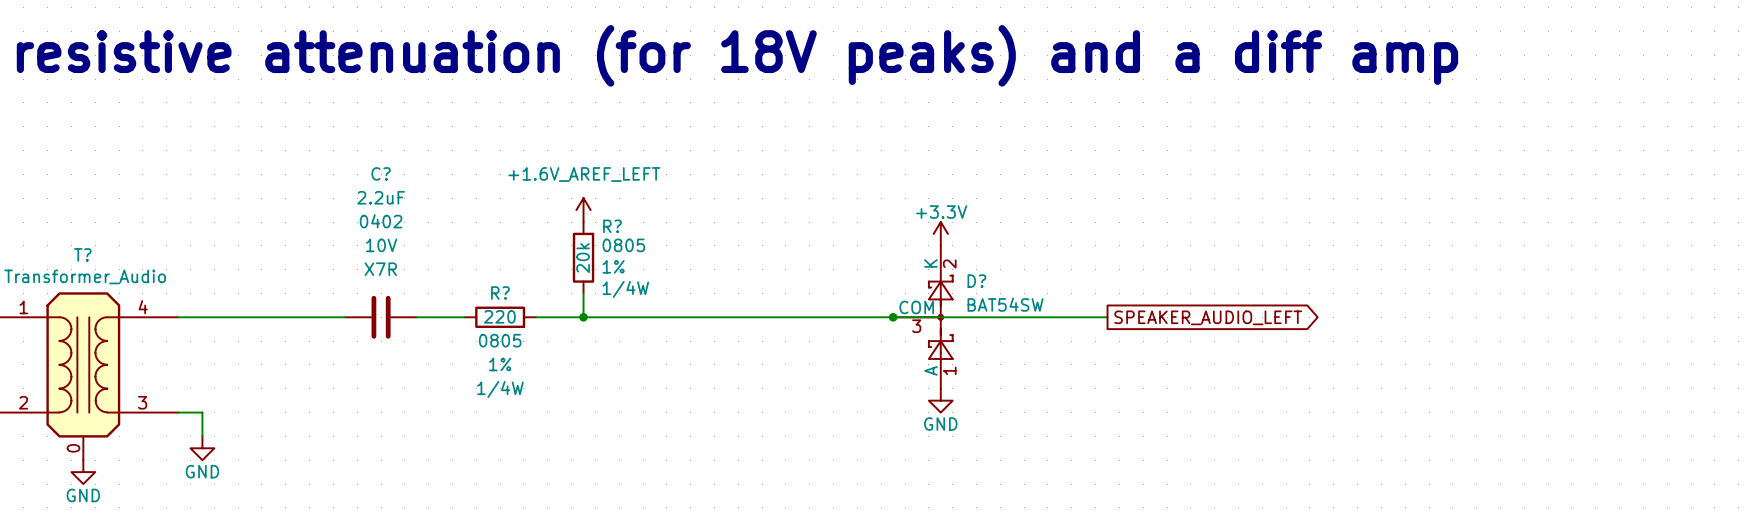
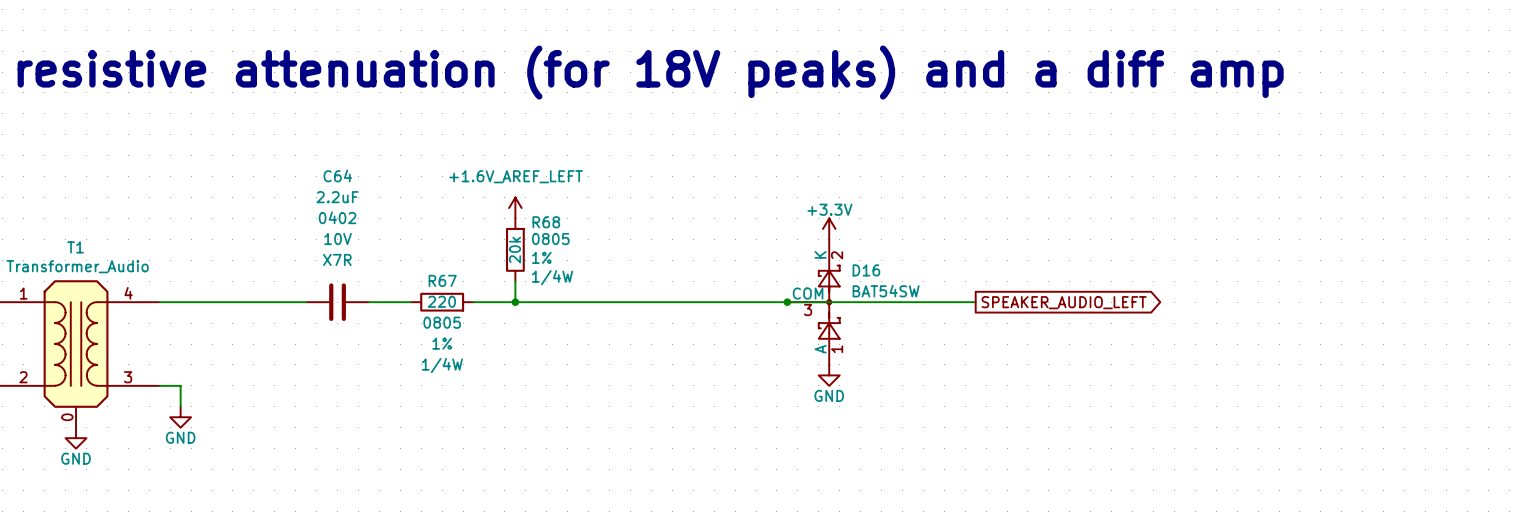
C? name: C? (381, 173) -> C64 (337, 176)
R? name: R? (612, 226) -> R68 (546, 222)
T? name: T? (82, 254) -> T1 (75, 247)
D? name: D? (976, 281) -> D16 (866, 270)
R? name: R? (500, 293) -> R67 (442, 280)

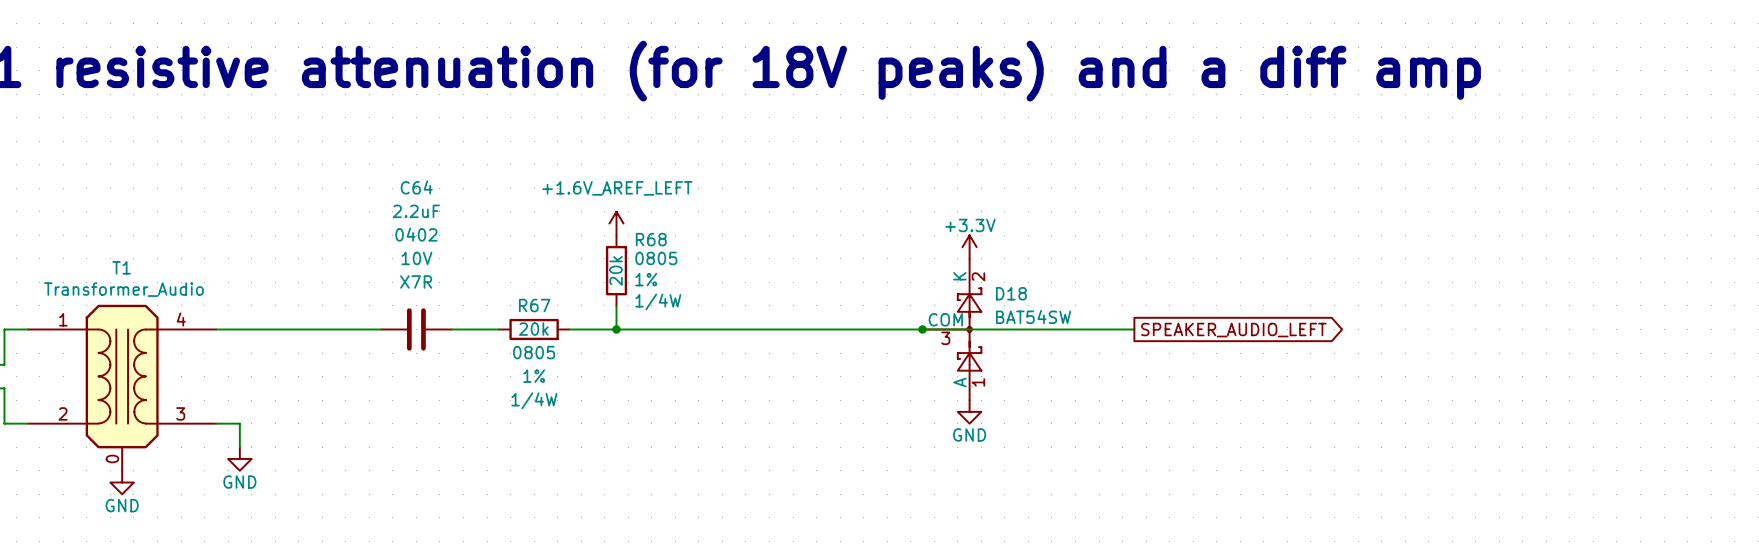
D16 name: D16 (866, 270) -> D18 (1011, 293)
R67 value: 220 (441, 301) -> 20k (533, 329)

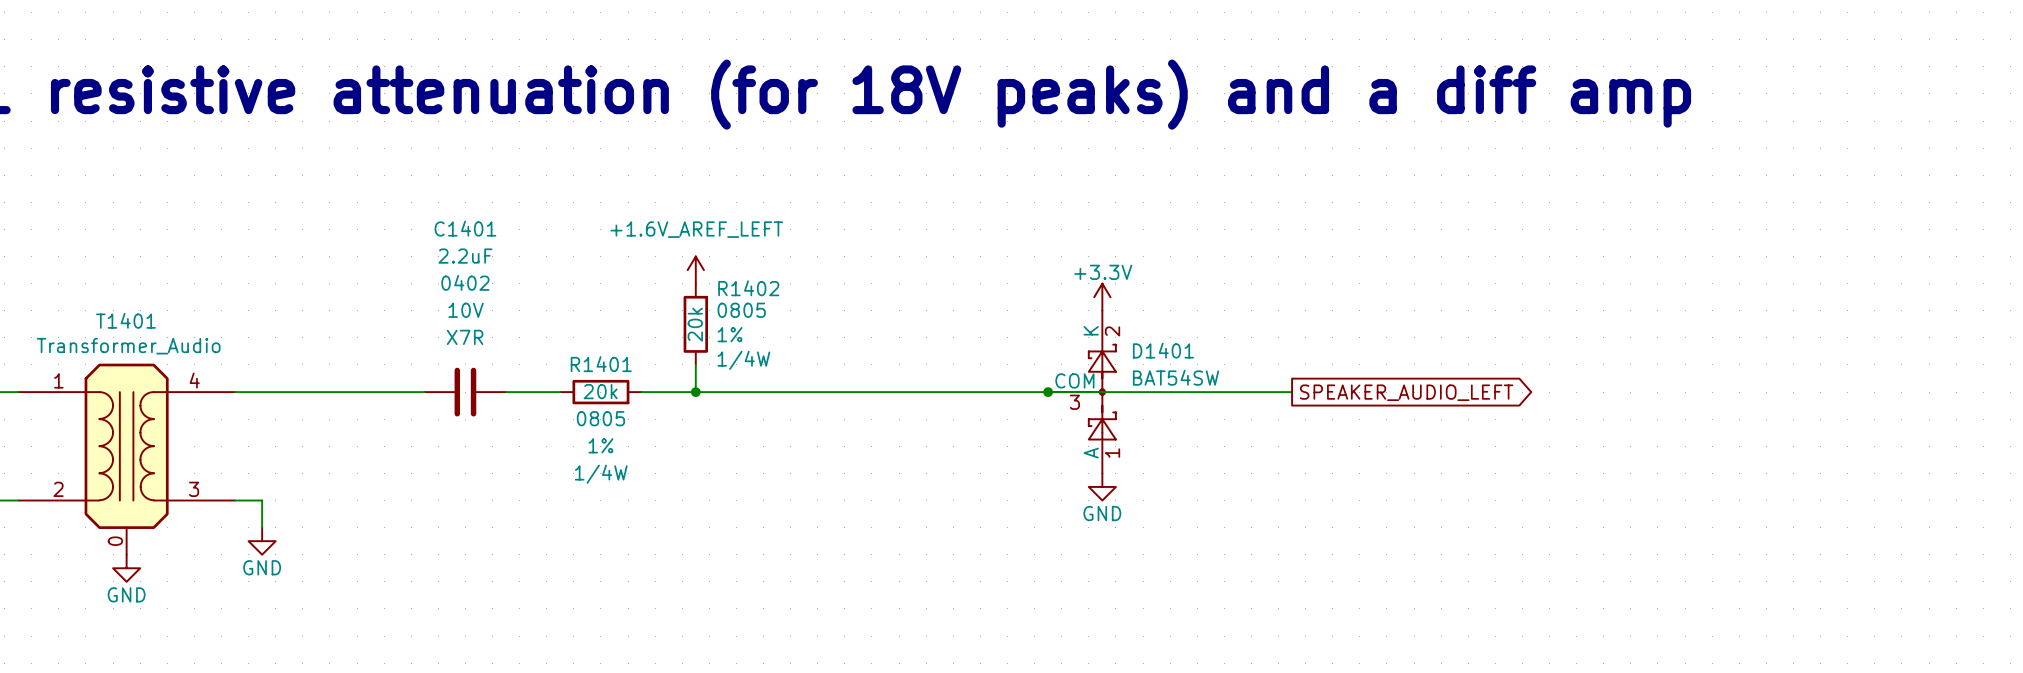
C64 name: C64 (416, 187) -> C1401 (465, 228)
R68 name: R68 (651, 239) -> R1402 (748, 288)
T1 name: T1 (121, 267) -> T1401 (125, 320)
D18 name: D18 (1011, 293) -> D1401 (1163, 350)
R67 name: R67 (534, 305) -> R1401 (601, 364)

